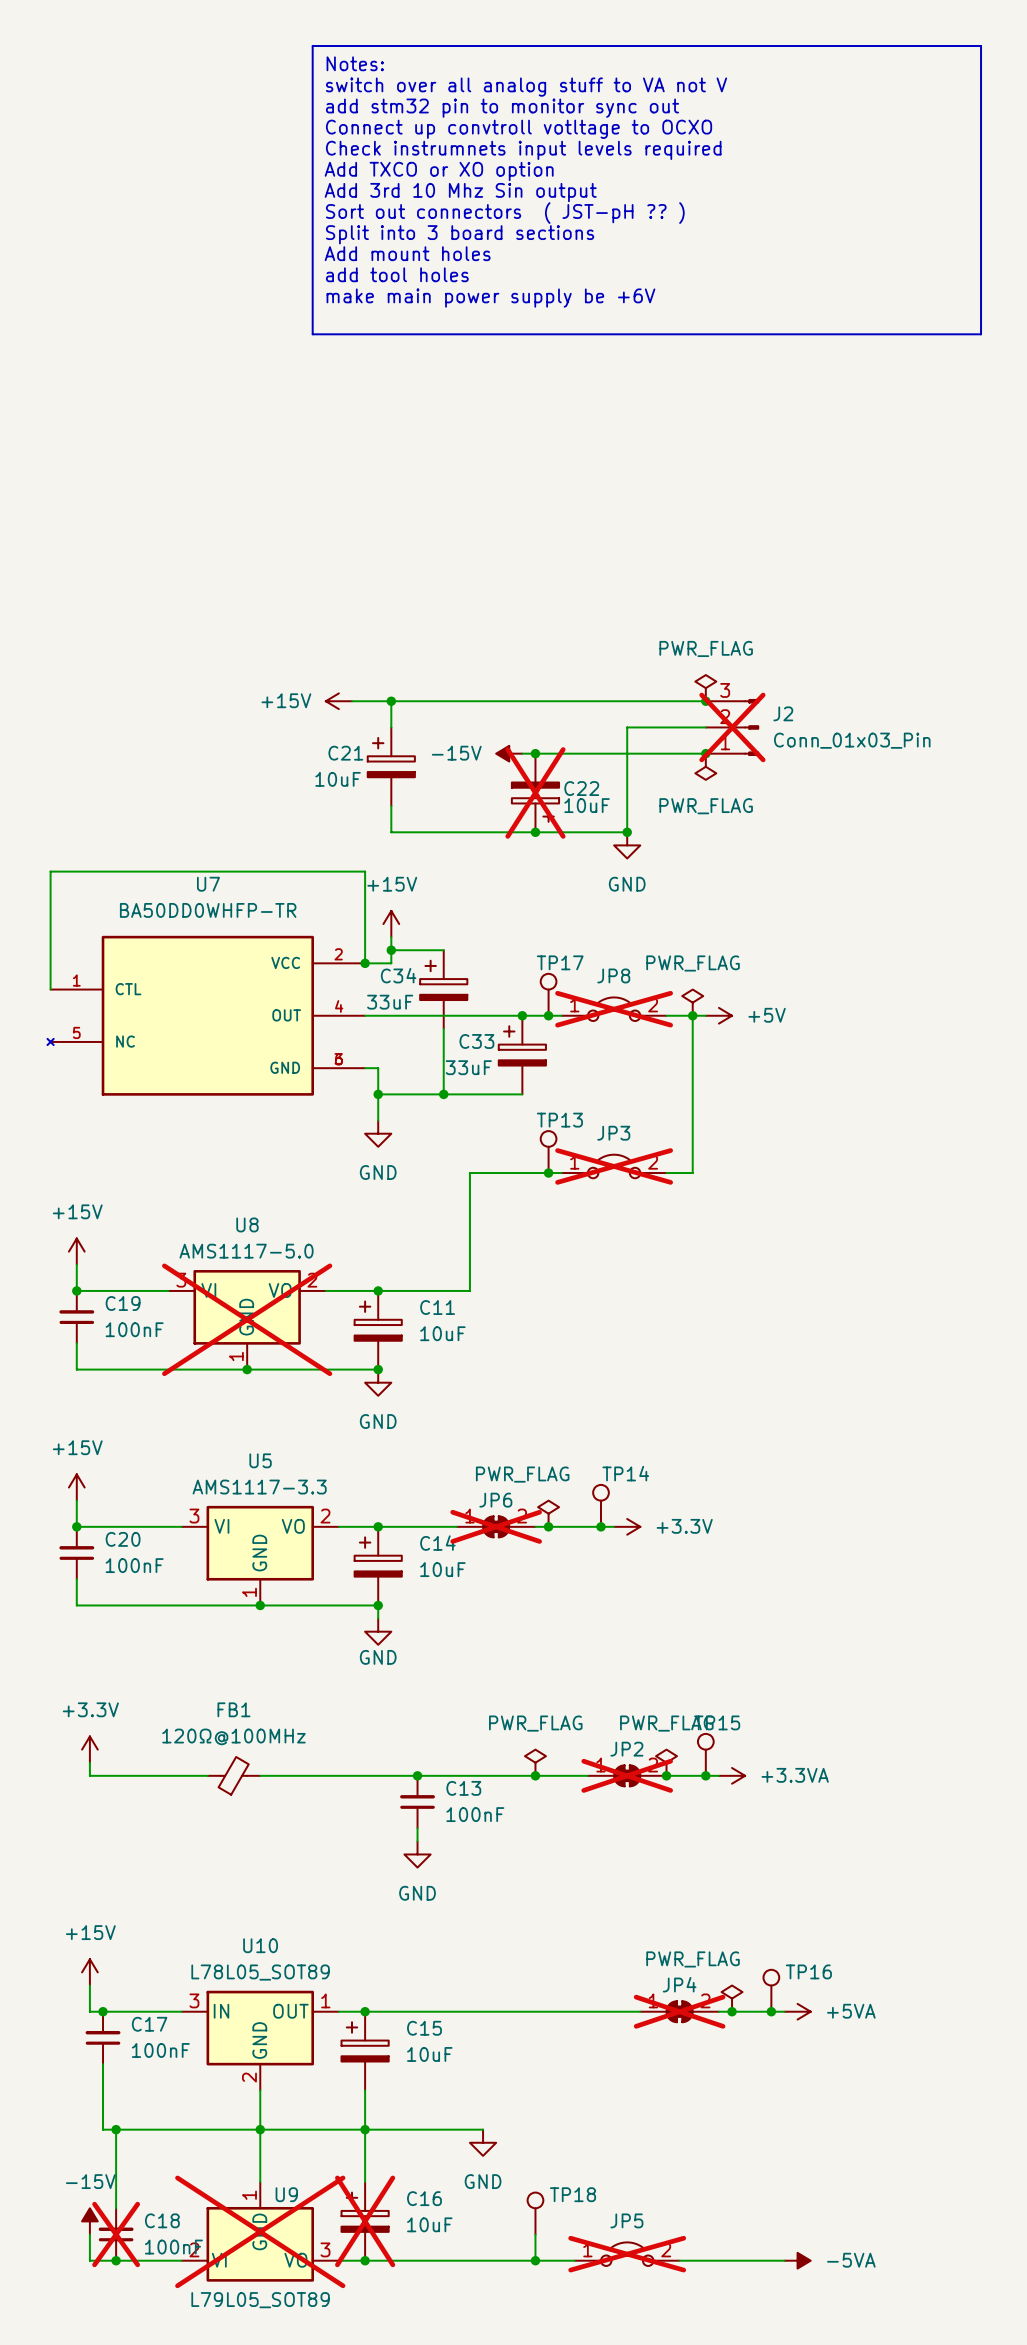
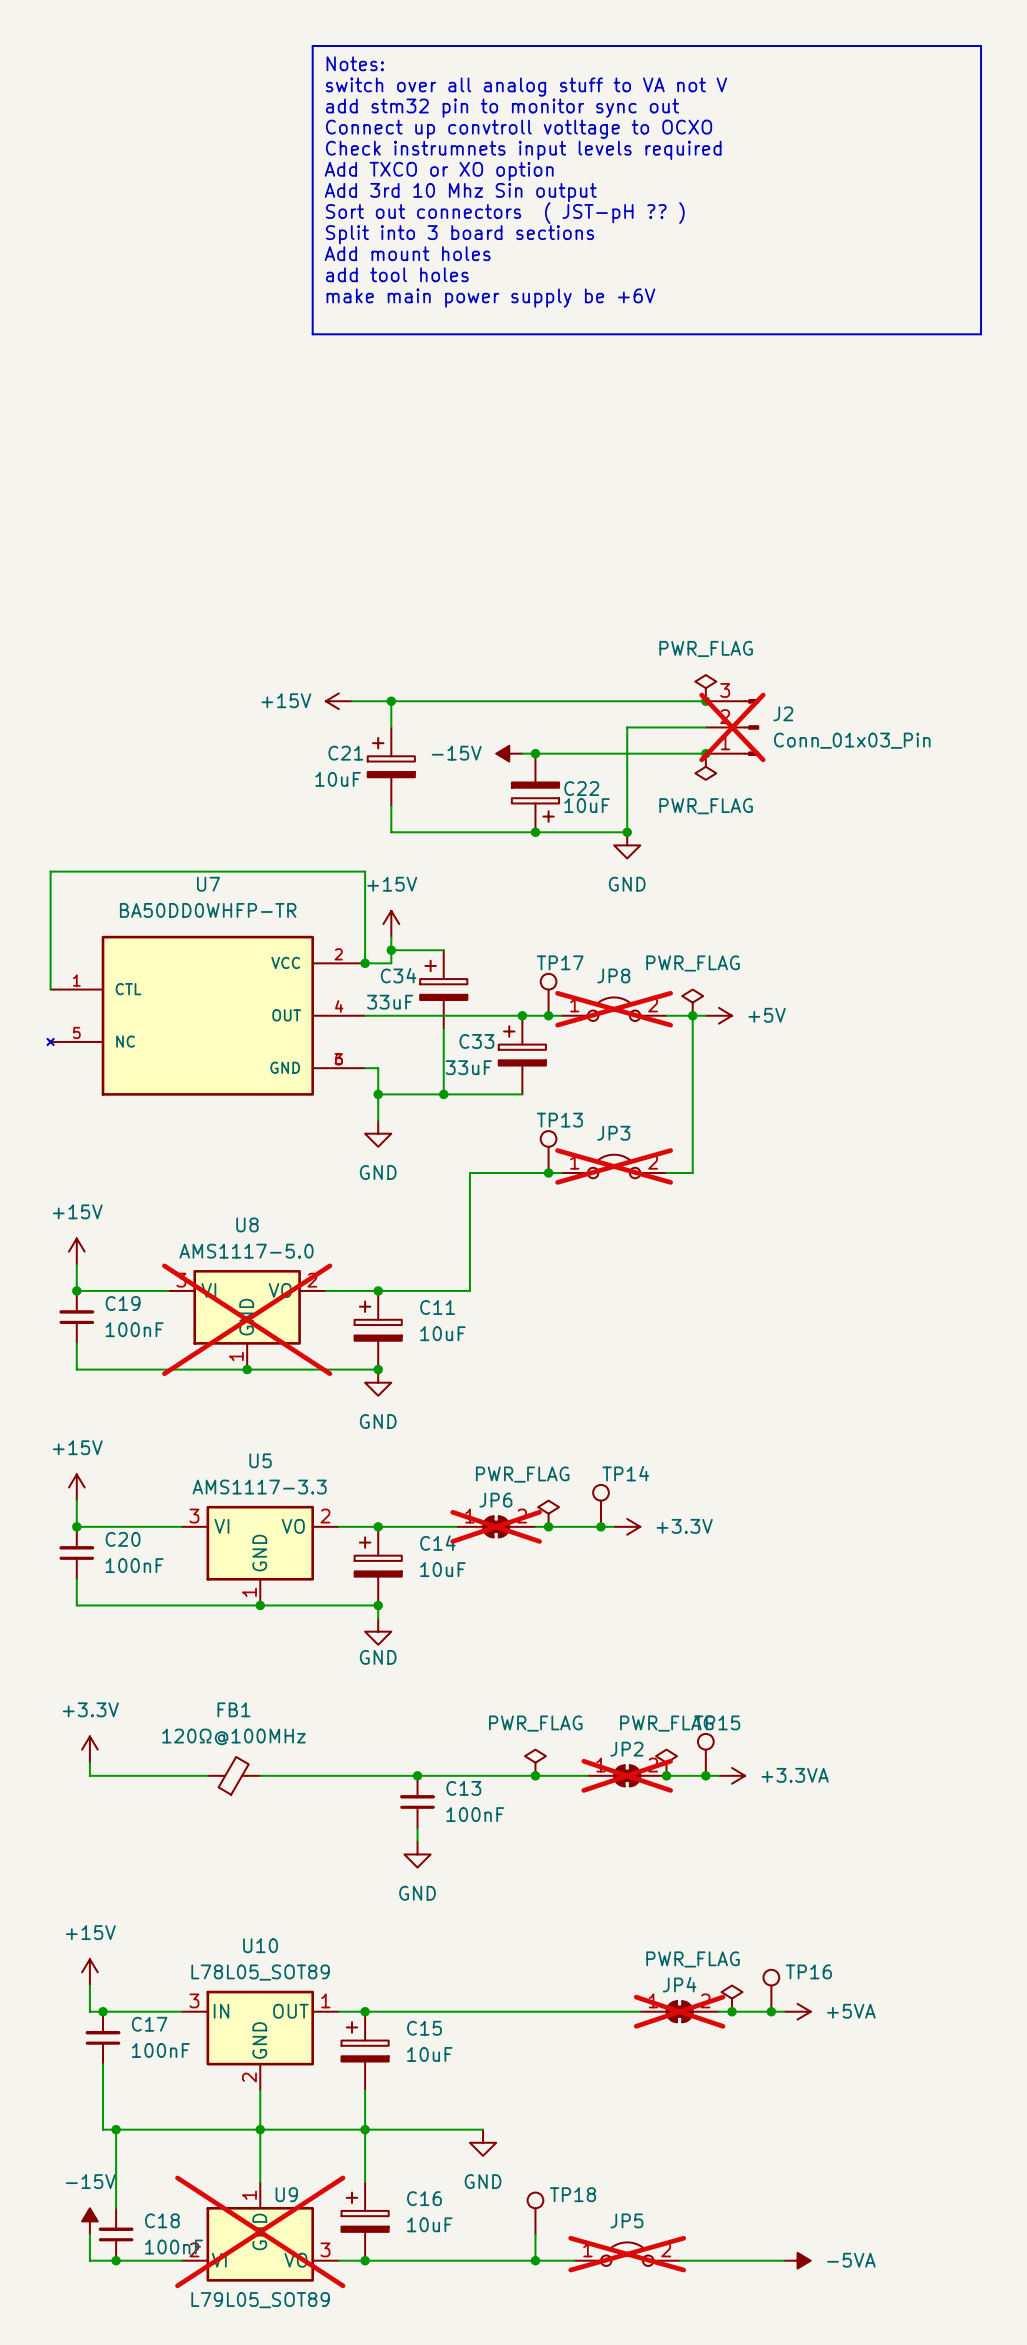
C22 do-not-place cross: (535, 792) -> none
C16 do-not-place cross: (365, 2221) -> none
C18 do-not-place cross: (116, 2234) -> none

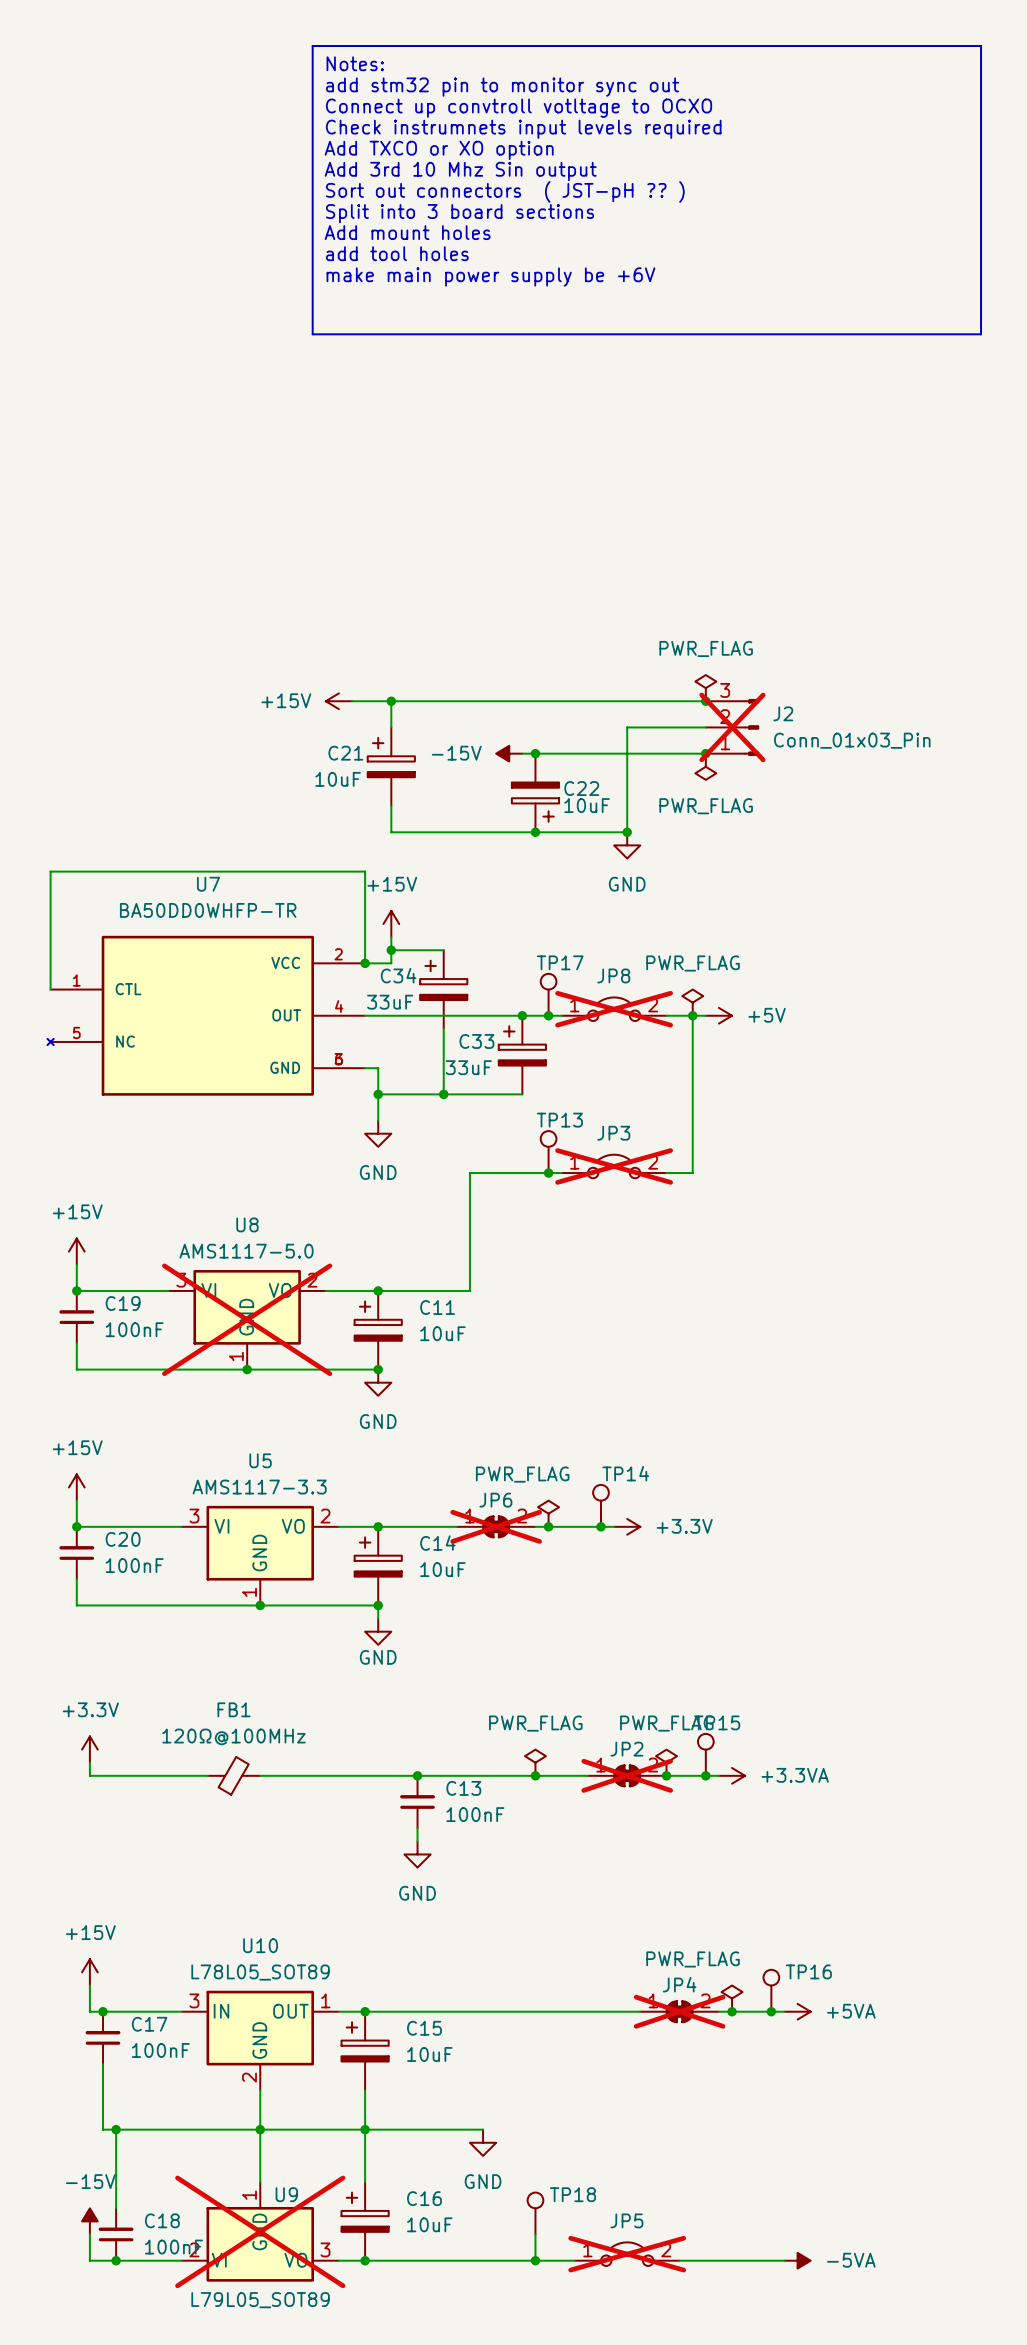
text: switch over all analog stuff to VA not V (526, 87) -> add stm32 pin to monitor sync out (502, 87)
text: add stm32 pin to monitor sync out (502, 108) -> Connect up convtroll votltage to OCXO (519, 108)
text: Connect up convtroll votltage to OCXO (519, 129) -> Check instrumnets input levels required (523, 129)
text: Check instrumnets input levels required (523, 150) -> Add TXCO or XO option (439, 150)
text: Add TXCO or XO option (439, 171) -> Add 3rd 10 Mhz Sin output (460, 171)
text: Add 3rd 10 Mhz Sin output (460, 192) -> Sort out connectors ( JST-pH ?? ) (505, 191)
text: Sort out connectors ( JST-pH ?? ) (505, 213) -> Split into 3 board sections (460, 213)
text: Split into 3 board sections (460, 234) -> Add mount holes (407, 232)
text: Add mount holes (407, 253) -> add tool holes (397, 253)
text: add tool holes (397, 274) -> make main power supply be +6V (490, 276)
text: make main power supply be +6V (490, 298) -> none

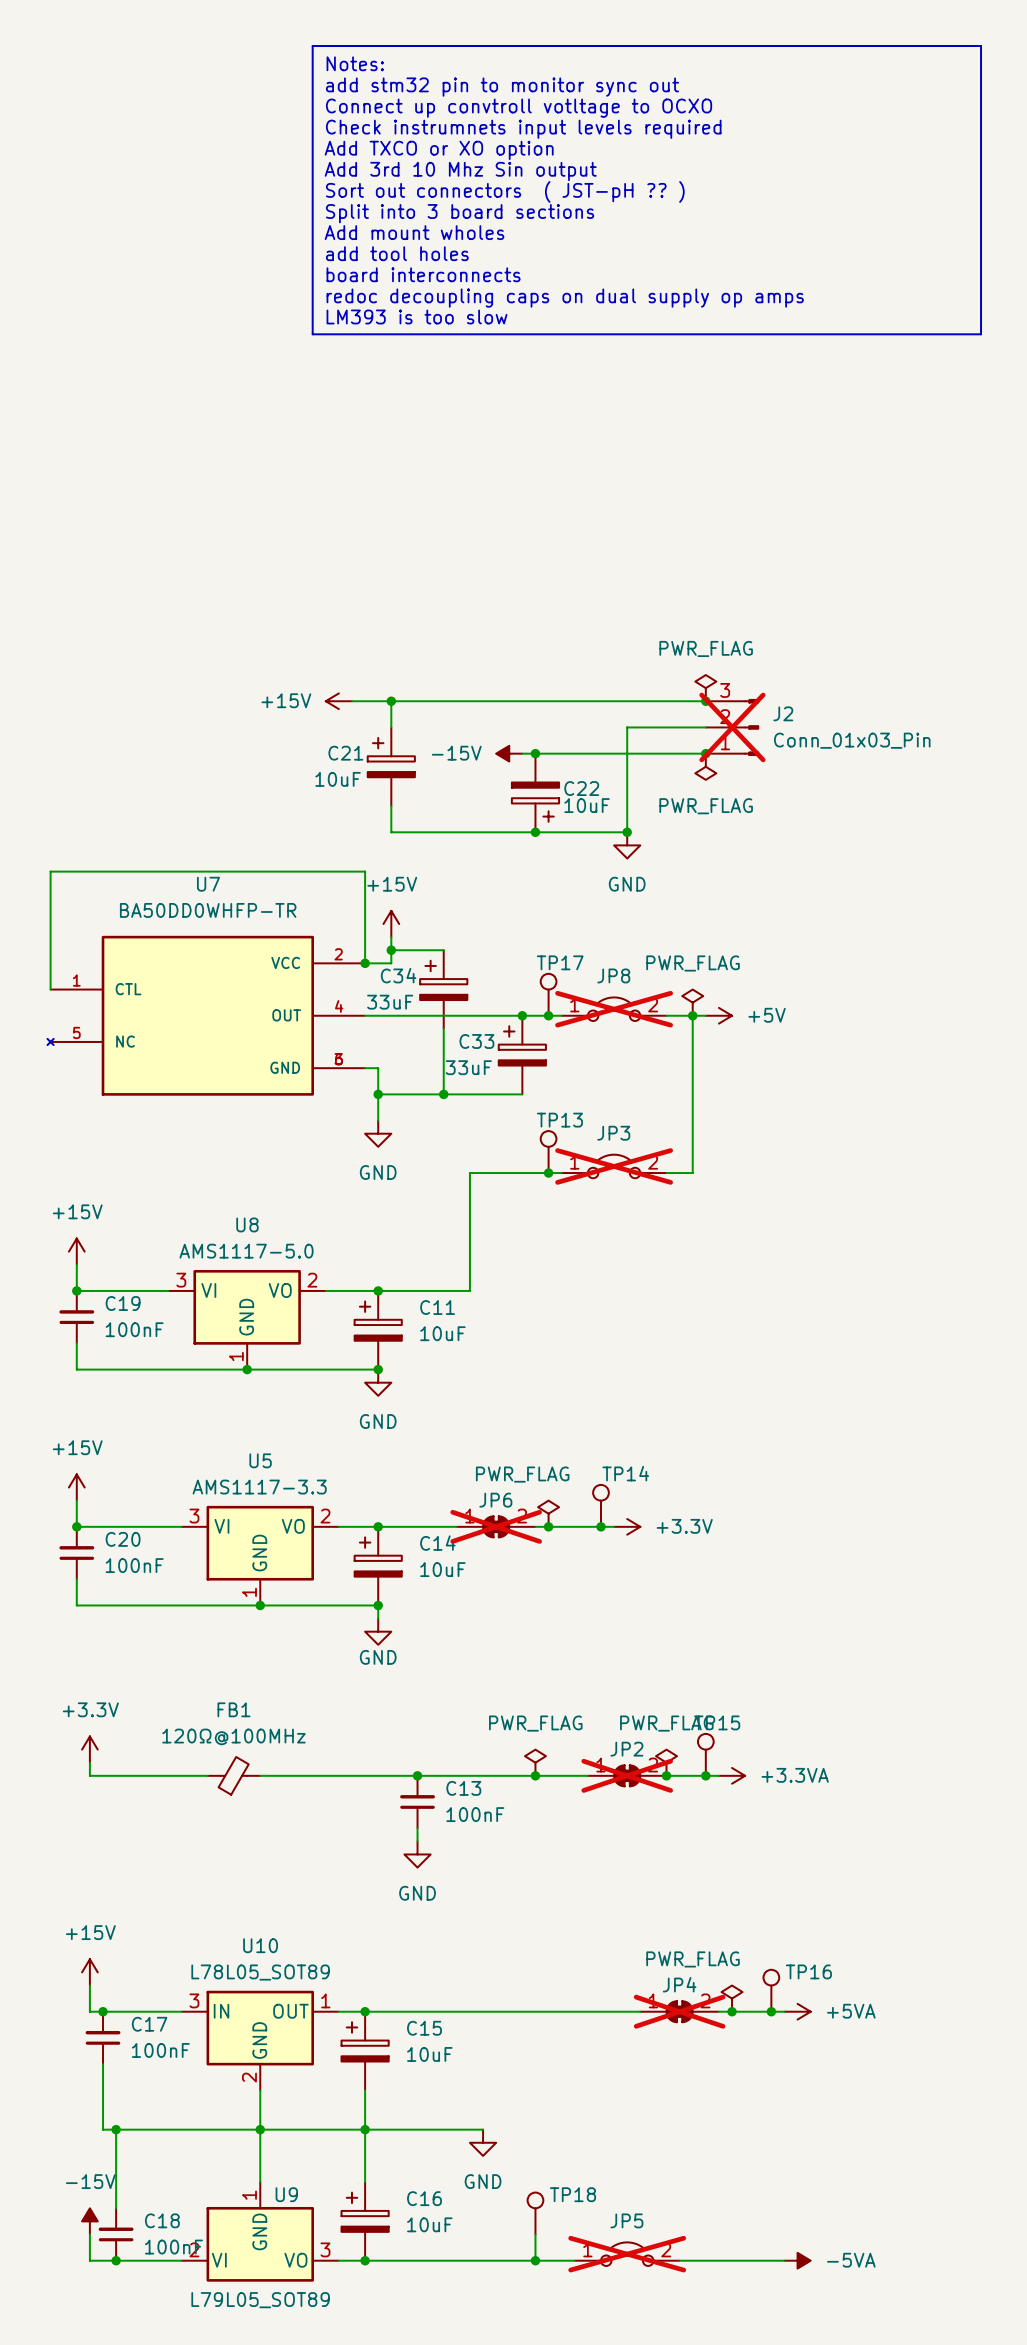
text: Add mount holes (407, 232) -> Add mount wholes (414, 232)
text: make main power supply be +6V (490, 276) -> board interconnects (423, 274)
text: none -> redoc decoupling caps on dual supply op amps (565, 298)
text: none -> LM393 is too slow (417, 316)
U8 do-not-place cross: (247, 1319) -> none
U9 do-not-place cross: (260, 2231) -> none

